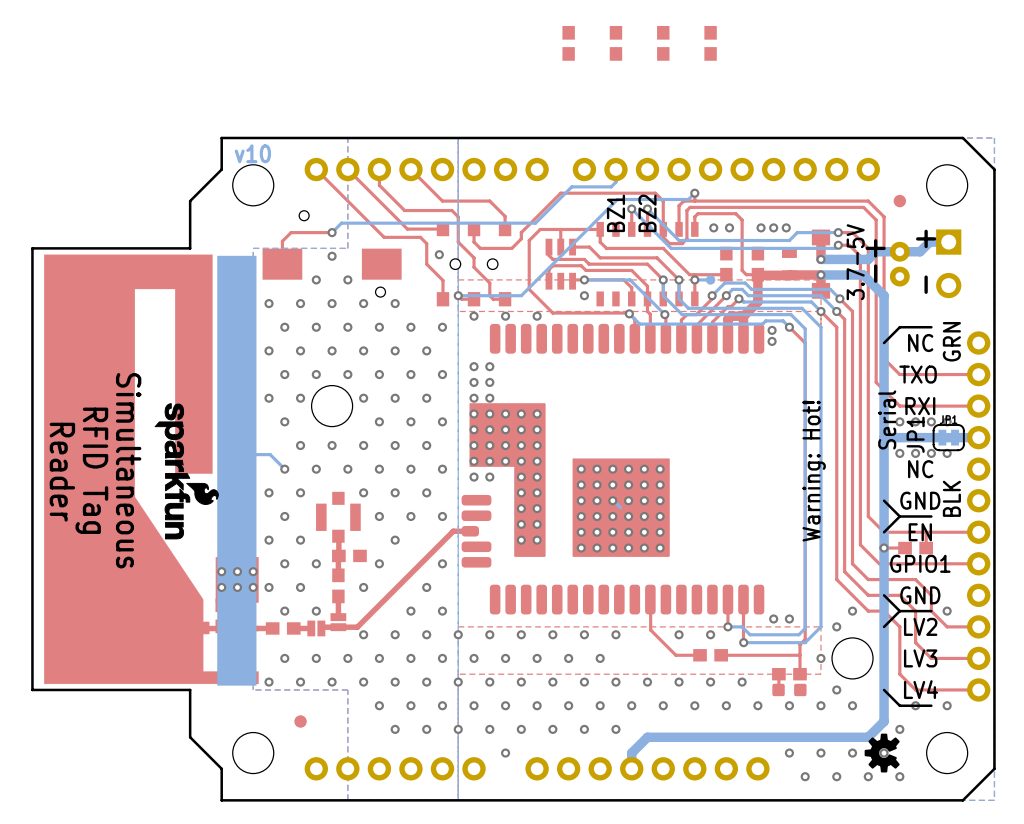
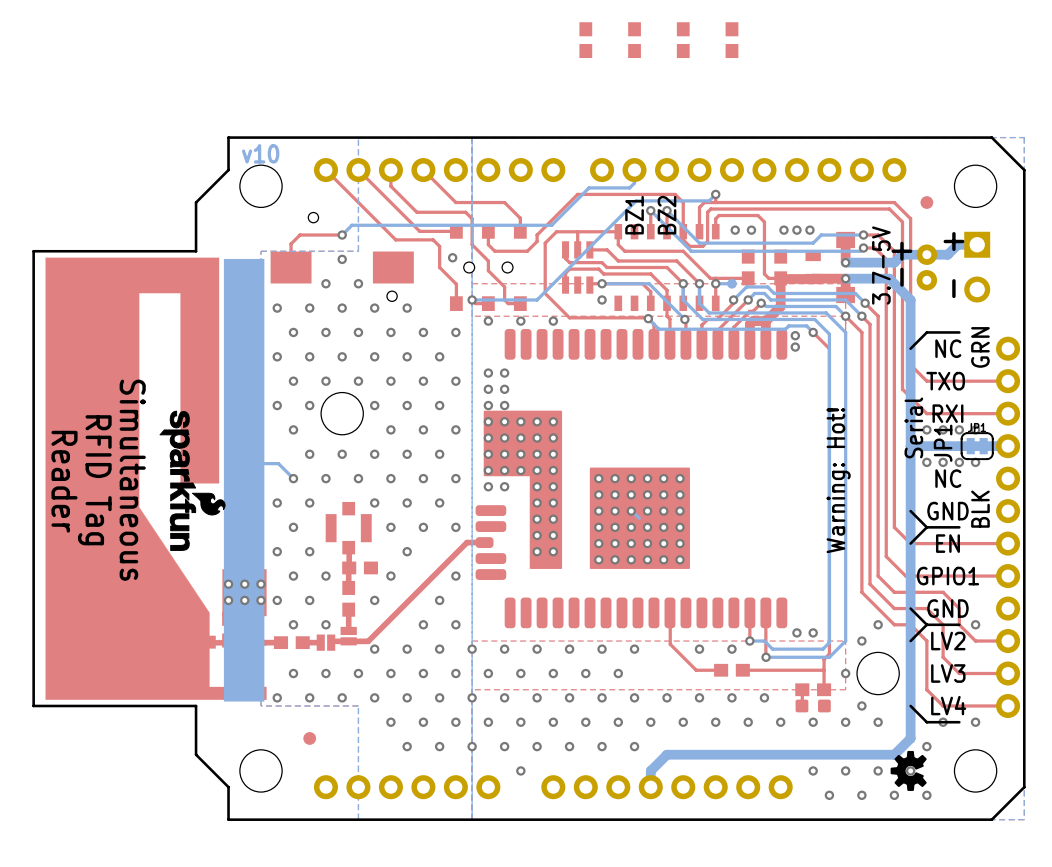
top track: (925, 532) (926, 548) -> none
via: (884, 548) -> none
top track: (905, 548) (884, 548) -> none
part: (915, 548) -> none

